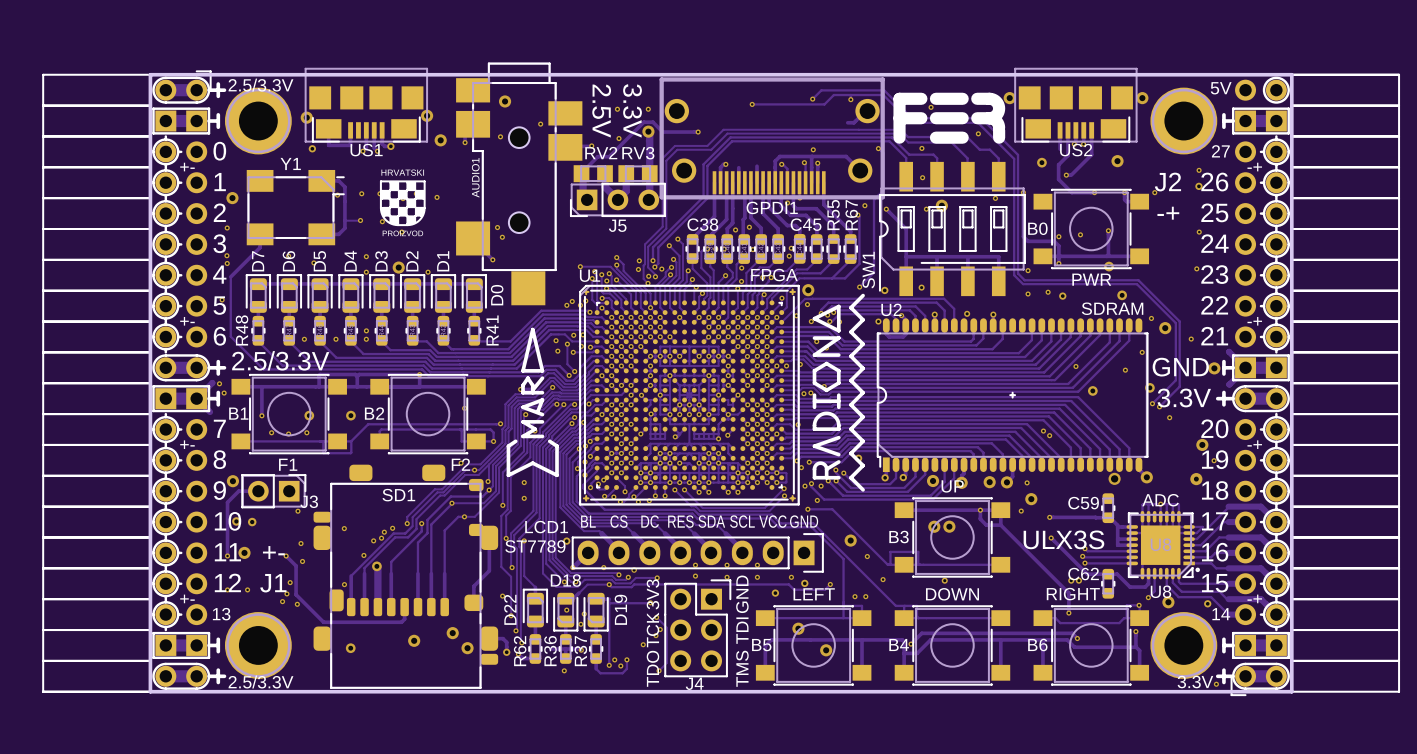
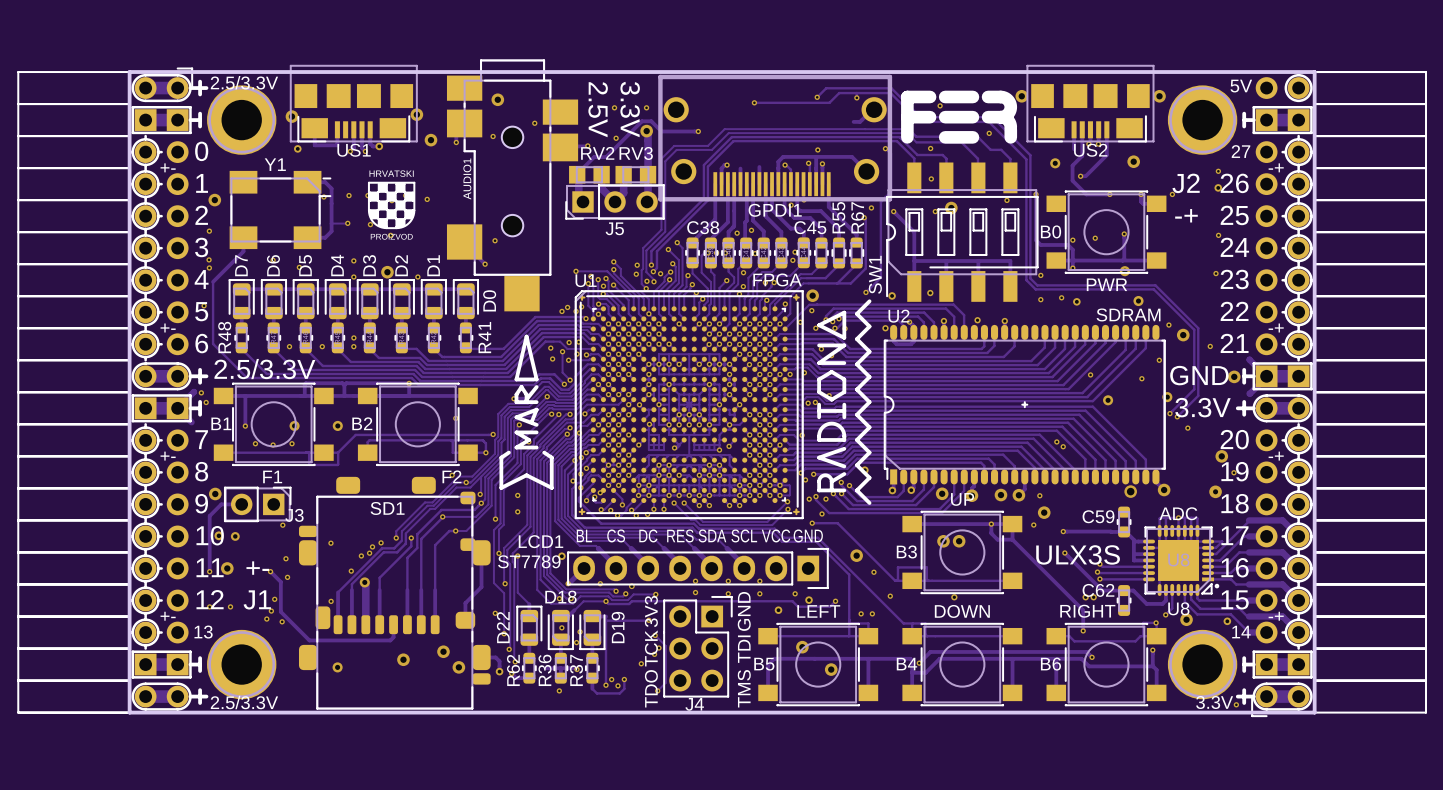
via: (497, 227) -> none

